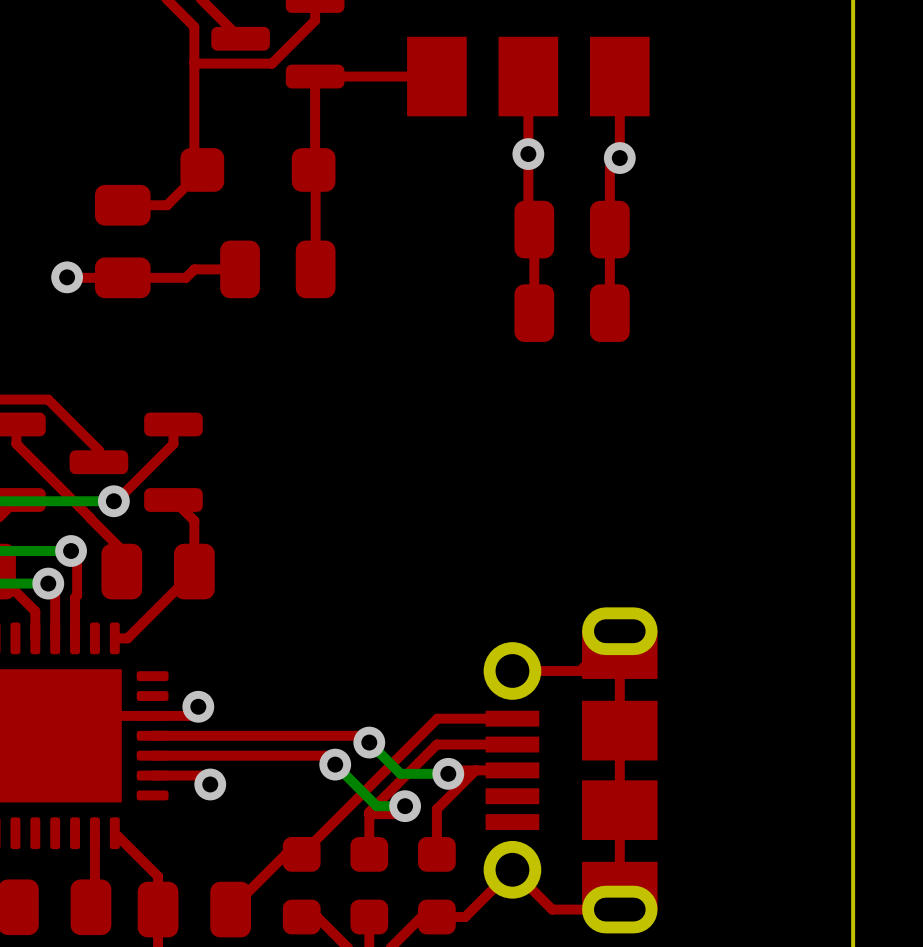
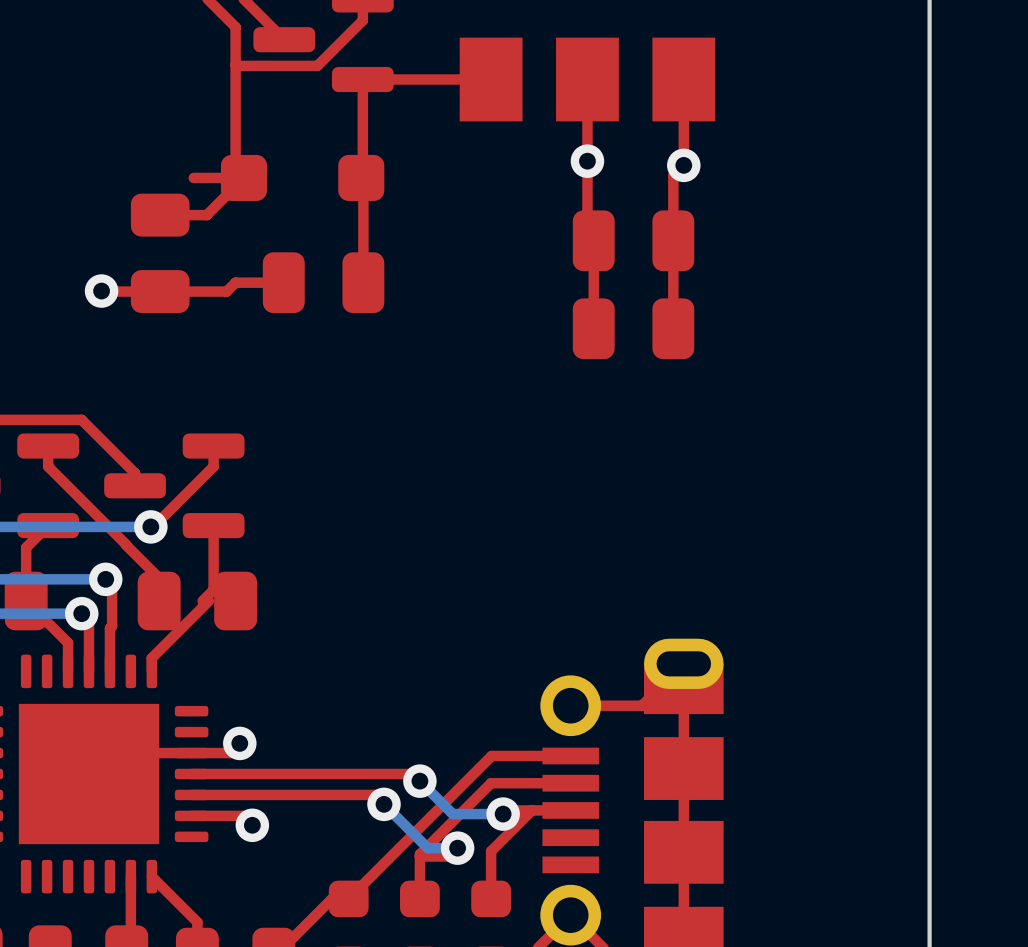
top track: none -> (243, 177) (193, 177)
top track: (173, 500) (194, 520) (194, 571) (127, 638) (114, 638) -> (208, 601) (151, 658) (151, 671)
top track: none -> (213, 525) (213, 590) (202, 601)

